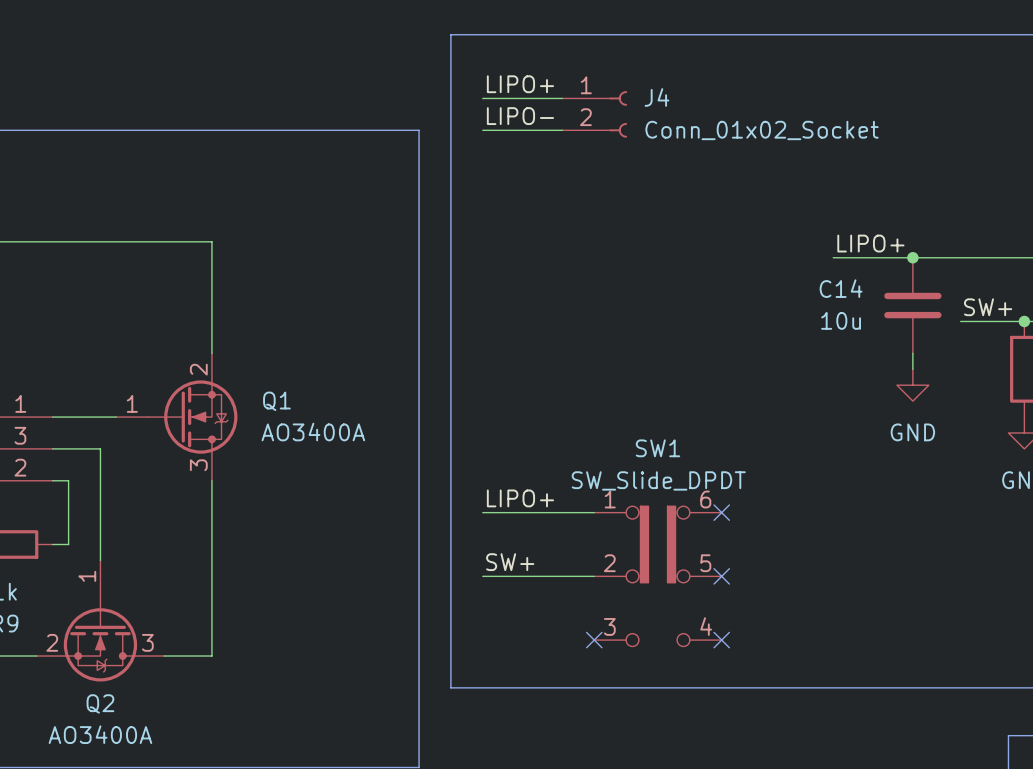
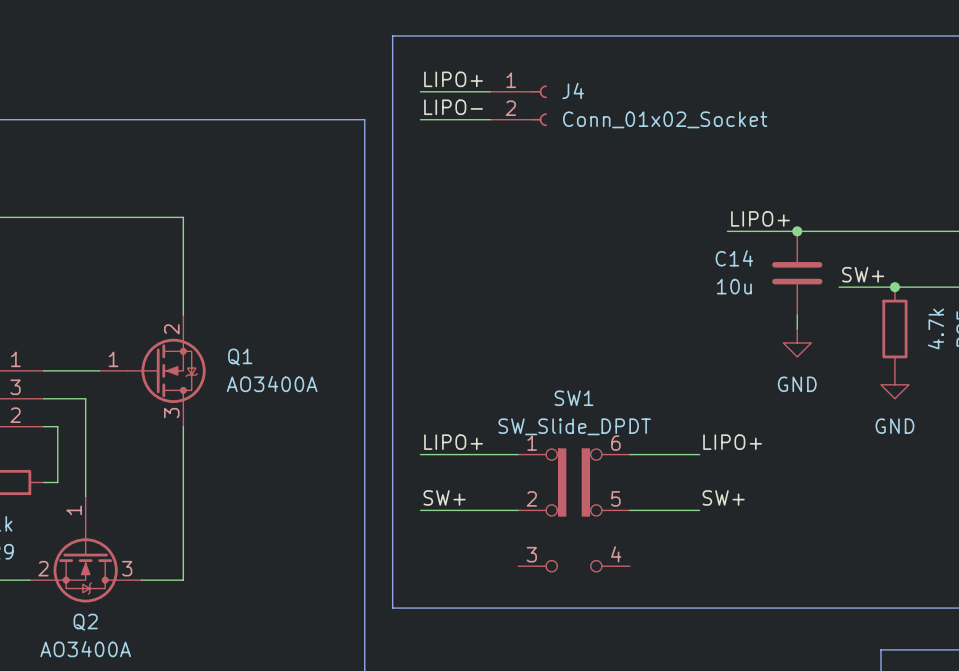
label: none -> LIPO+ (732, 442)
wire: none -> (629, 454) (699, 454)
no-connect mark: (721, 512) -> none
label: none -> SW+ (723, 497)
wire: none -> (629, 510) (699, 510)
no-connect mark: (721, 576) -> none
no-connect mark: (594, 640) -> none
no-connect mark: (721, 640) -> none

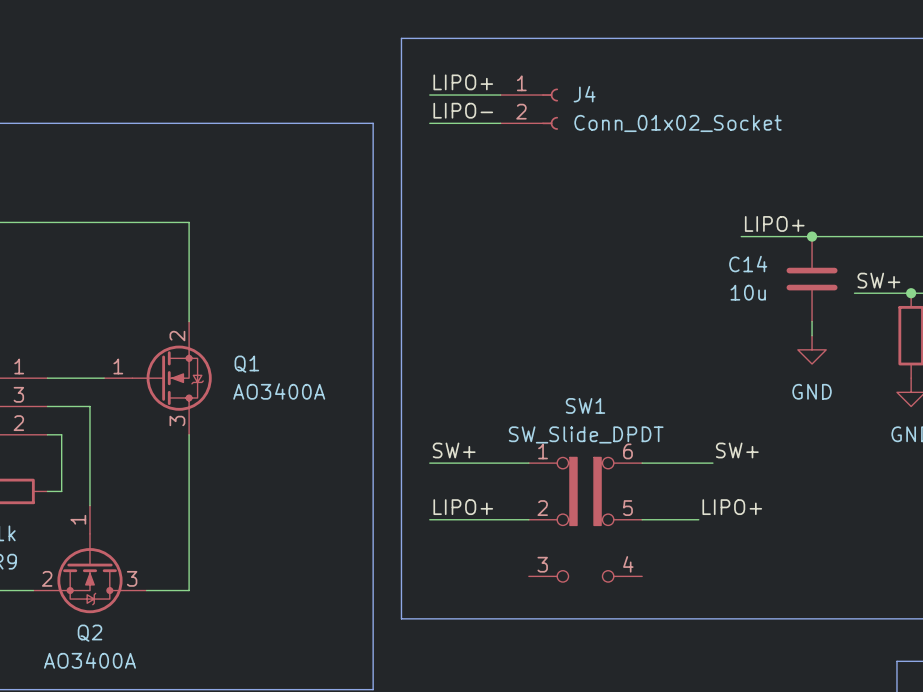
label: LIPO+ (453, 442) -> SW+ (454, 450)
label: LIPO+ (732, 442) -> SW+ (737, 450)
label: SW+ (444, 497) -> LIPO+ (463, 507)
label: none -> LIPO+ (732, 507)
label: SW+ (723, 497) -> none
wire: (685, 510) (699, 510) -> none

